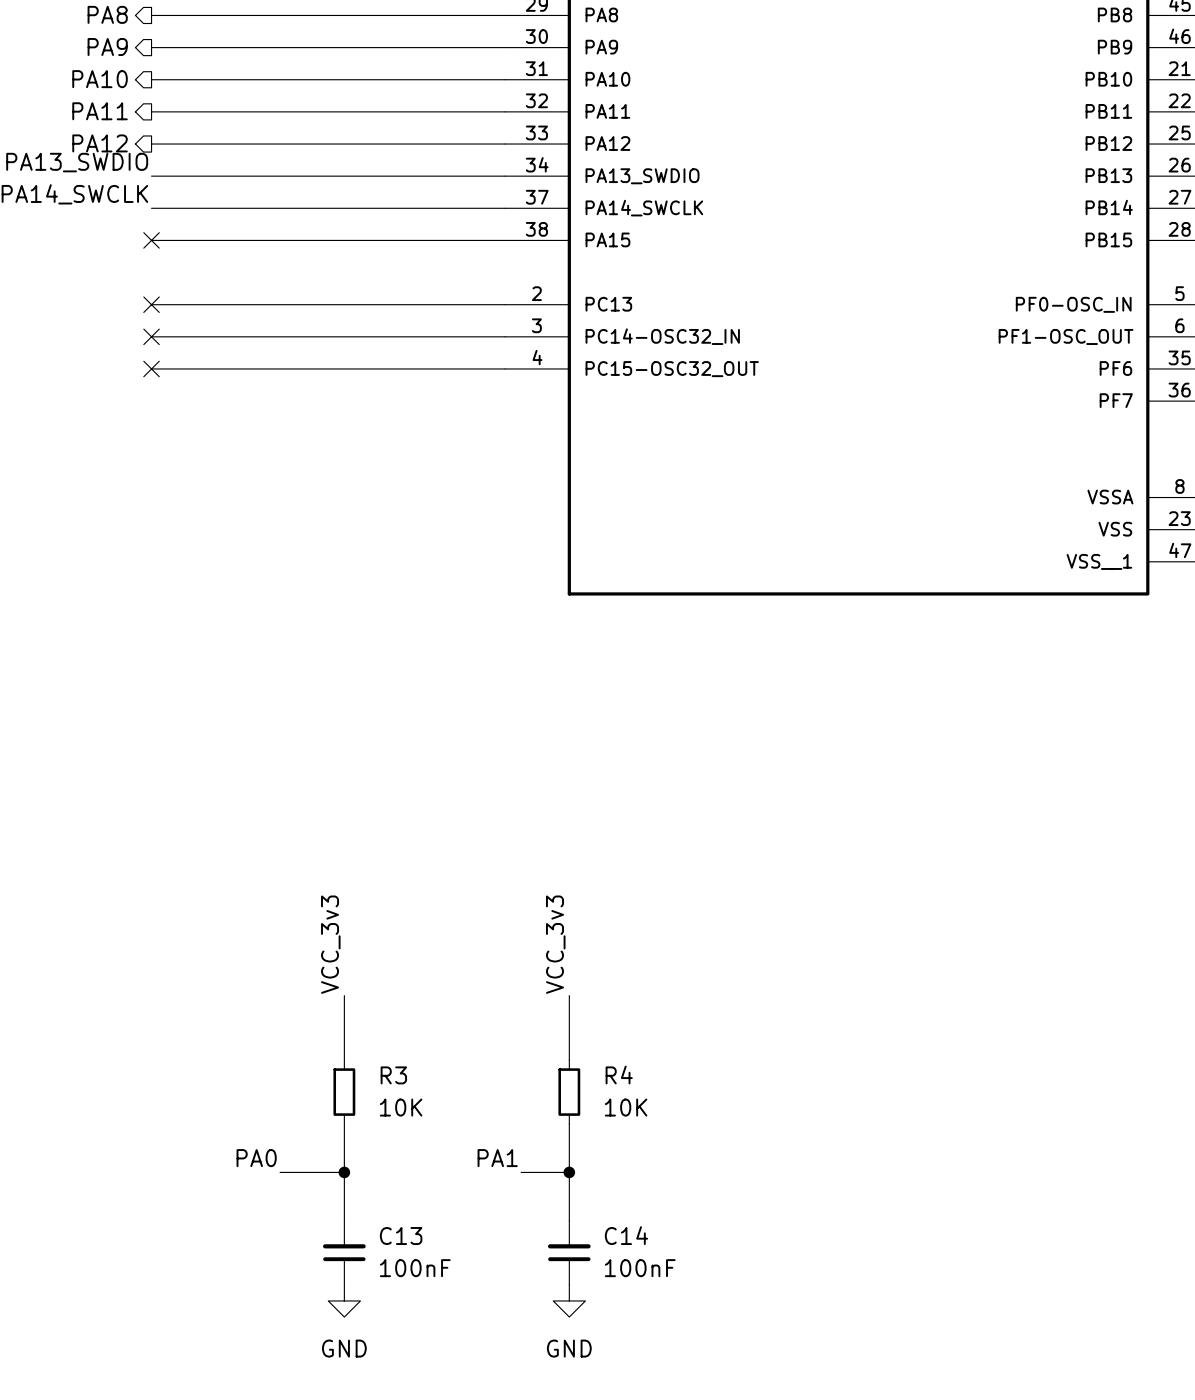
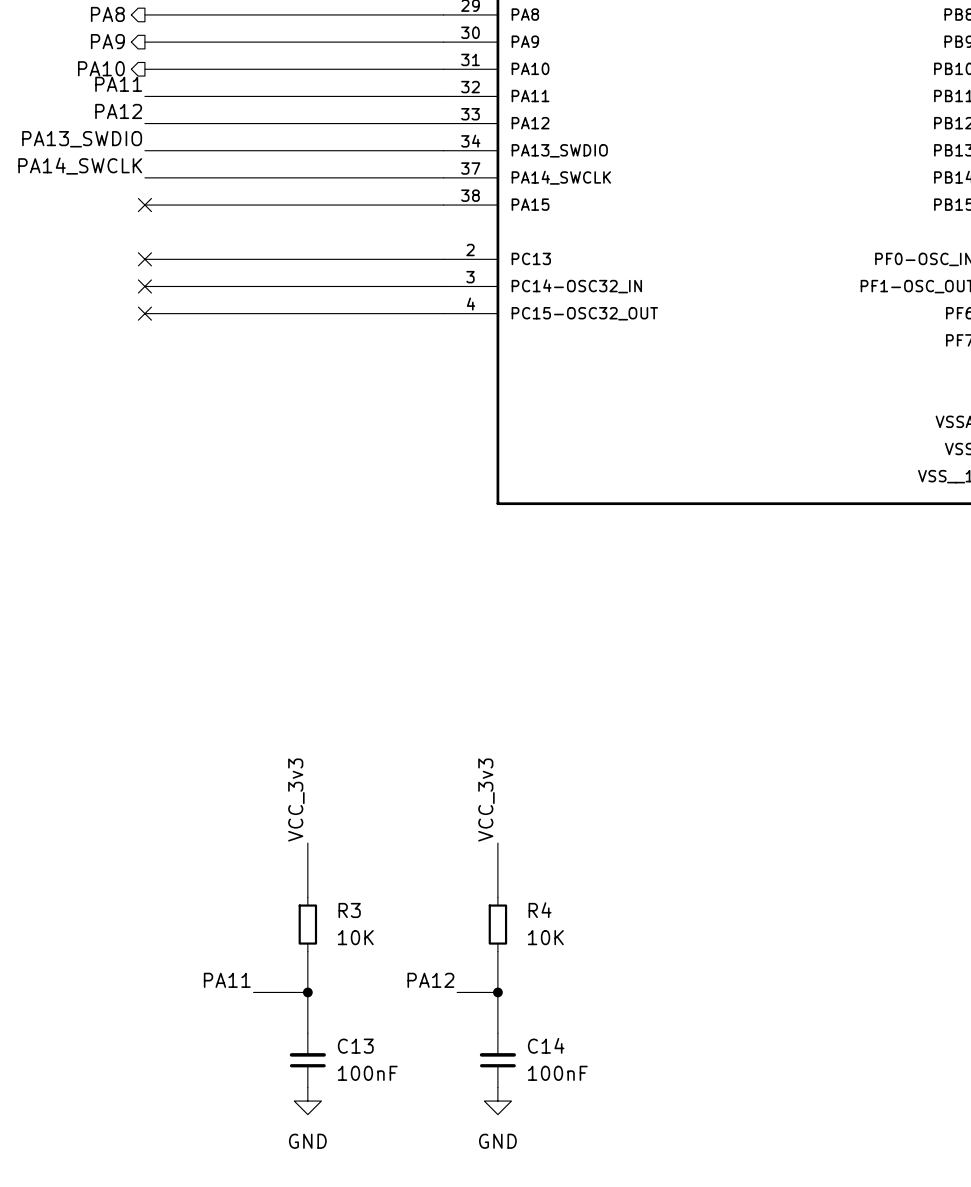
label: none -> PA11 (118, 84)
hierarchical label: PA11 (100, 111) -> none
label: none -> PA12 (118, 111)
hierarchical label: PA12 (100, 143) -> none
label: PA0 (256, 1158) -> PA11 (227, 980)
label: PA1 (497, 1158) -> PA12 (430, 980)

